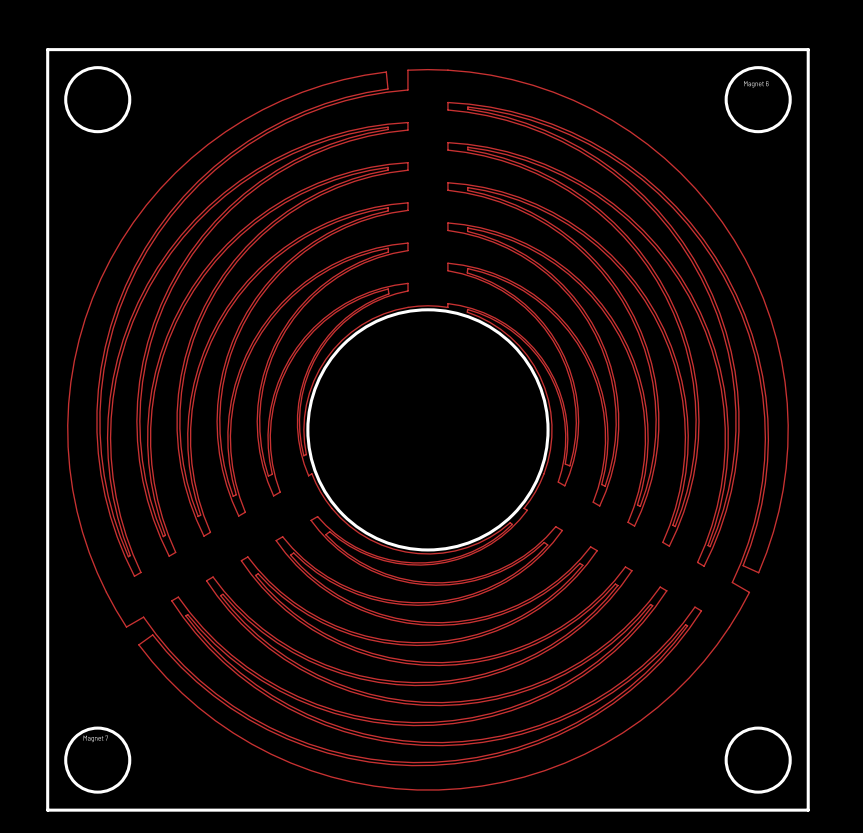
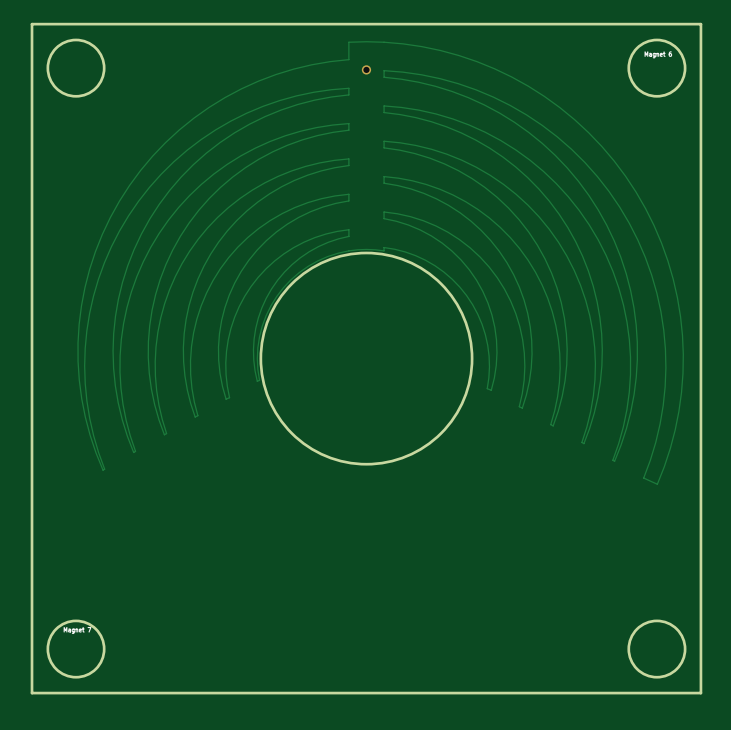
track: (386, 72) (387, 89) (325, 103) (285, 119) (248, 140) (214, 166) (169, 212) (134, 266) (110, 326) (98, 389) (98, 453) (110, 516) (134, 576) (140, 572) (126, 535) (116, 497) (111, 458) (111, 418) (116, 379) (126, 340) (149, 286) (171, 252) (196, 222) (241, 183) (275, 162) (311, 145) (349, 134) (388, 127) (388, 129) (330, 144) (276, 170) (229, 207) (190, 252) (169, 286) (147, 342) (137, 401) (139, 461) (153, 519) (169, 556) (175, 552) (157, 500) (151, 464) (150, 428) (154, 391) (162, 356) (184, 306) (215, 261) (240, 235) (269, 212) (301, 194) (334, 179) (388, 167) (388, 170) (352, 179) (318, 192) (272, 222) (233, 260) (204, 306) (185, 358) (177, 412) (180, 466) (189, 502) (203, 536) (210, 532) (194, 481) (190, 428) (198, 375) (219, 326) (249, 282) (289, 247) (336, 221) (388, 207) (388, 210) (341, 226) (300, 251) (265, 285) (239, 327) (222, 373) (217, 421) (222, 470) (238, 516) (245, 512) (232, 467) (231, 420) (241, 374) (253, 346) (280, 307) (316, 277) (343, 262) (388, 248) (388, 252) (359, 262) (320, 286) (298, 308) (273, 347) (263, 375) (257, 421) (263, 467) (273, 495) (280, 492) (270, 449) (271, 421) (277, 392) (288, 366) (304, 341) (335, 312) (360, 298) (388, 288) (388, 293) (355, 310) (336, 326) (320, 345) (308, 367) (301, 390) (297, 427) (300, 452) (308, 475) (311, 473) (325, 500) (349, 526) (370, 539) (393, 549) (430, 553) (455, 550) (478, 543) (510, 522) (512, 524) (483, 546) (461, 556) (437, 561) (413, 562) (389, 559) (366, 552) (335, 533) (317, 516) (311, 520) (328, 540) (359, 564) (383, 575) (422, 584) (449, 584) (488, 576) (523, 559) (544, 542) (547, 544) (513, 574) (486, 588) (443, 601) (413, 602) (383, 599) (340, 584) (303, 558) (282, 536) (276, 540) (307, 576) (346, 603) (391, 619) (422, 624) (454, 624) (500, 614) (543, 593) (580, 563) (582, 565) (548, 598) (507, 623) (461, 638) (413, 642) (365, 636) (320, 618) (280, 592) (247, 556) (241, 560) (273, 599) (312, 629) (357, 651) (389, 660) (422, 665) (472, 662) (520, 650) (565, 627) (591, 607) (615, 584) (617, 585) (593, 612) (565, 635) (518, 661) (467, 677) (413, 682) (359, 675) (308, 657) (262, 629) (236, 604) (213, 577) (206, 580) (241, 623) (269, 648) (299, 668) (350, 691) (385, 700) (422, 705) (477, 702) (513, 694) (548, 682) (596, 654) (625, 631) (650, 604) (652, 605) (612, 649) (581, 673) (547, 692) (510, 707) (472, 717) (413, 722) (354, 715) (316, 704) (280, 688) (247, 667) (216, 642) (178, 597) (171, 600) (195, 633) (223, 662) (254, 687) (288, 708) (343, 731) (382, 740) (422, 745) (482, 742) (521, 734) (559, 720) (595, 703) (628, 680) (659, 654) (685, 624) (687, 625) (645, 673) (594, 712) (537, 740) (497, 753) (455, 760) (413, 762) (371, 759) (329, 750) (289, 736) (251, 717) (216, 693) (169, 650) (143, 617) (126, 627) (106, 592) (89, 552) (77, 511) (69, 468) (68, 403) (74, 360) (85, 318) (110, 259) (146, 205) (191, 158) (225, 131) (262, 109) (322, 85) (386, 72) -> none
via: none -> (366, 69)
track: (467, 107) (467, 109) (507, 117) (544, 130) (597, 158) (644, 196) (683, 242) (712, 294) (731, 351) (738, 411) (735, 471) (720, 529) (704, 566) (697, 562) (711, 525) (721, 487) (725, 428) (721, 388) (712, 350) (688, 296) (667, 263) (641, 233) (596, 195) (544, 167) (506, 154) (467, 147) (467, 149) (503, 158) (538, 171) (586, 199) (627, 236) (650, 265) (669, 296) (689, 348) (696, 384) (698, 421) (696, 458) (689, 494) (669, 546) (662, 542) (675, 508) (682, 473) (684, 419) (674, 366) (654, 316) (623, 271) (583, 235) (536, 207) (503, 195) (467, 187) (467, 190) (499, 199) (530, 212) (572, 239) (607, 274) (634, 316) (651, 363) (658, 413) (655, 462) (647, 495) (634, 526) (628, 522) (642, 476) (645, 428) (637, 380) (619, 336) (591, 296) (556, 264) (514, 241) (467, 228) (467, 231) (512, 247) (551, 274) (573, 297) (599, 337) (614, 382) (618, 413) (614, 460) (599, 505) (593, 502) (601, 473) (605, 428) (601, 398) (585, 356) (568, 330) (536, 299) (496, 277) (467, 268) (467, 272) (503, 288) (525, 304) (543, 323) (564, 357) (573, 382) (578, 421) (573, 460) (564, 485) (558, 482) (565, 446) (564, 422) (559, 398) (550, 376) (537, 355) (520, 338) (490, 317) (467, 309) (467, 312) (500, 329) (519, 345) (540, 376) (548, 400) (551, 424) (550, 449) (540, 483) (524, 508) (527, 510) (510, 528) (491, 543) (469, 555) (433, 564) (408, 564) (384, 560) (349, 546) (329, 531) (325, 534) (347, 553) (372, 568) (413, 581) (442, 582) (471, 579) (498, 570) (523, 556) (555, 526) (562, 530) (542, 554) (506, 581) (478, 594) (433, 604) (387, 602) (357, 594) (317, 572) (293, 553) (290, 555) (312, 577) (351, 602) (396, 618) (442, 622) (473, 619) (518, 605) (557, 580) (590, 546) (597, 550) (565, 587) (526, 616) (481, 636) (433, 644) (384, 642) (337, 629) (294, 606) (258, 573) (255, 575) (293, 612) (338, 640) (389, 657) (442, 662) (495, 655) (545, 636) (589, 606) (625, 566) (631, 570) (597, 612) (554, 646) (521, 663) (487, 676) (433, 685) (378, 682) (325, 668) (277, 642) (248, 620) (222, 594) (220, 595) (258, 635) (287, 657) (318, 675) (352, 689) (388, 698) (442, 702) (496, 696) (531, 685) (565, 670) (610, 640) (637, 615) (660, 587) (666, 590) (629, 637) (599, 663) (566, 686) (530, 703) (492, 716) (433, 725) (393, 724) (353, 718) (297, 699) (245, 669) (214, 644) (187, 614) (185, 615) (211, 646) (240, 672) (272, 695) (307, 714) (344, 728) (383, 737) (442, 742) (482, 739) (520, 731) (576, 710) (610, 690) (642, 666) (670, 638) (694, 607) (701, 610) (676, 645) (646, 676) (595, 715) (557, 735) (517, 750) (475, 760) (433, 765) (369, 762) (327, 753) (286, 738) (248, 719) (213, 695) (181, 667) (152, 634) (138, 644) (182, 693) (215, 720) (251, 744) (311, 770) (374, 786) (438, 789) (481, 786) (544, 770) (584, 754) (640, 720) (673, 693) (717, 644) (749, 592) (732, 582) (748, 543) (759, 502) (764, 460) (764, 417) (754, 354) (741, 314) (723, 276) (700, 240) (673, 208) (641, 179) (607, 154) (550, 126) (509, 114) (467, 107) -> none

